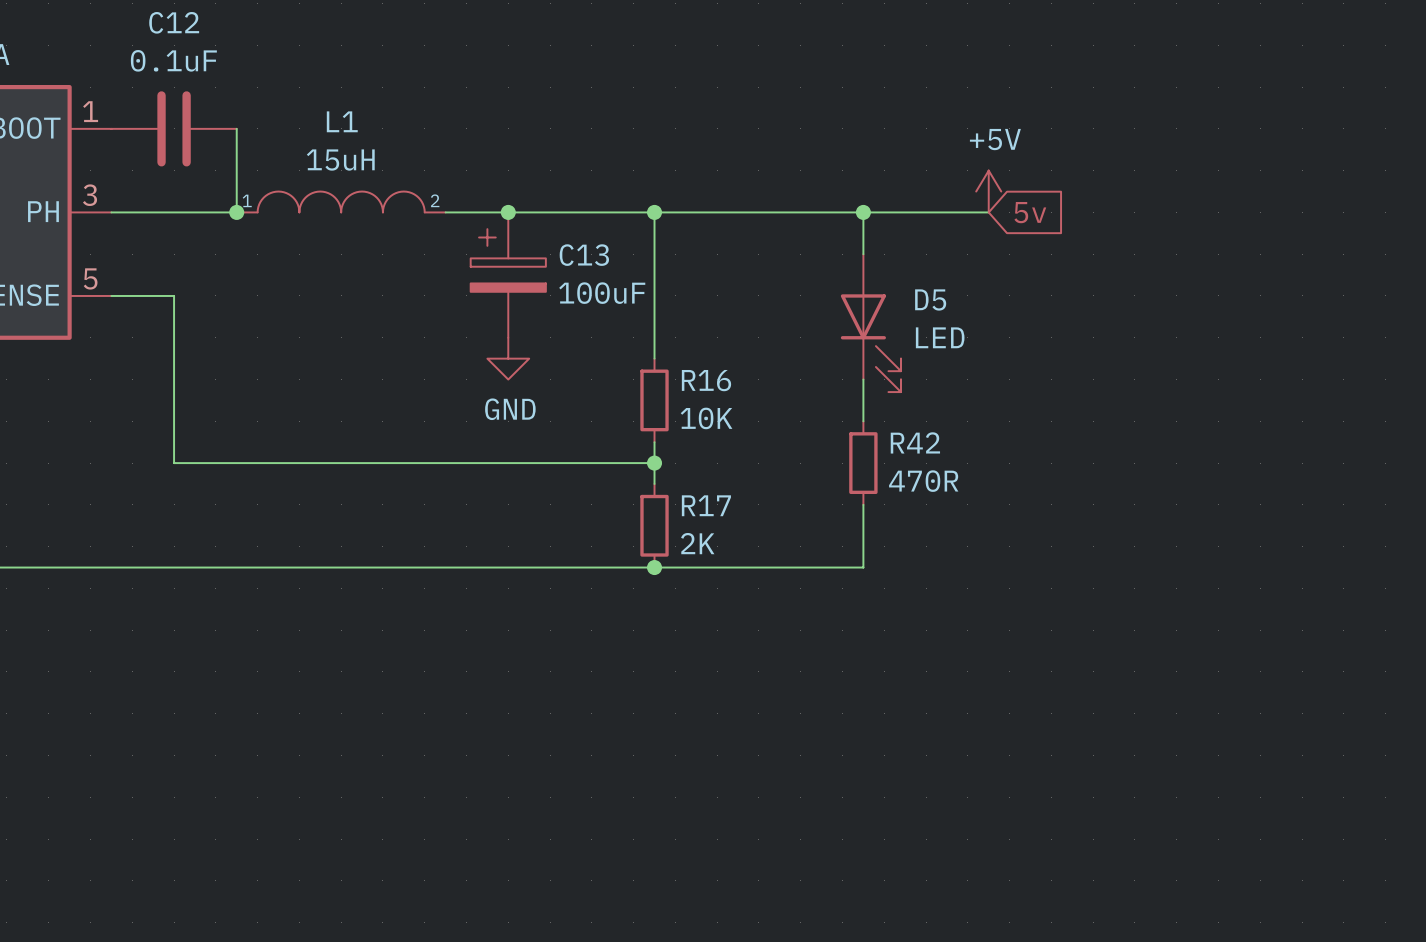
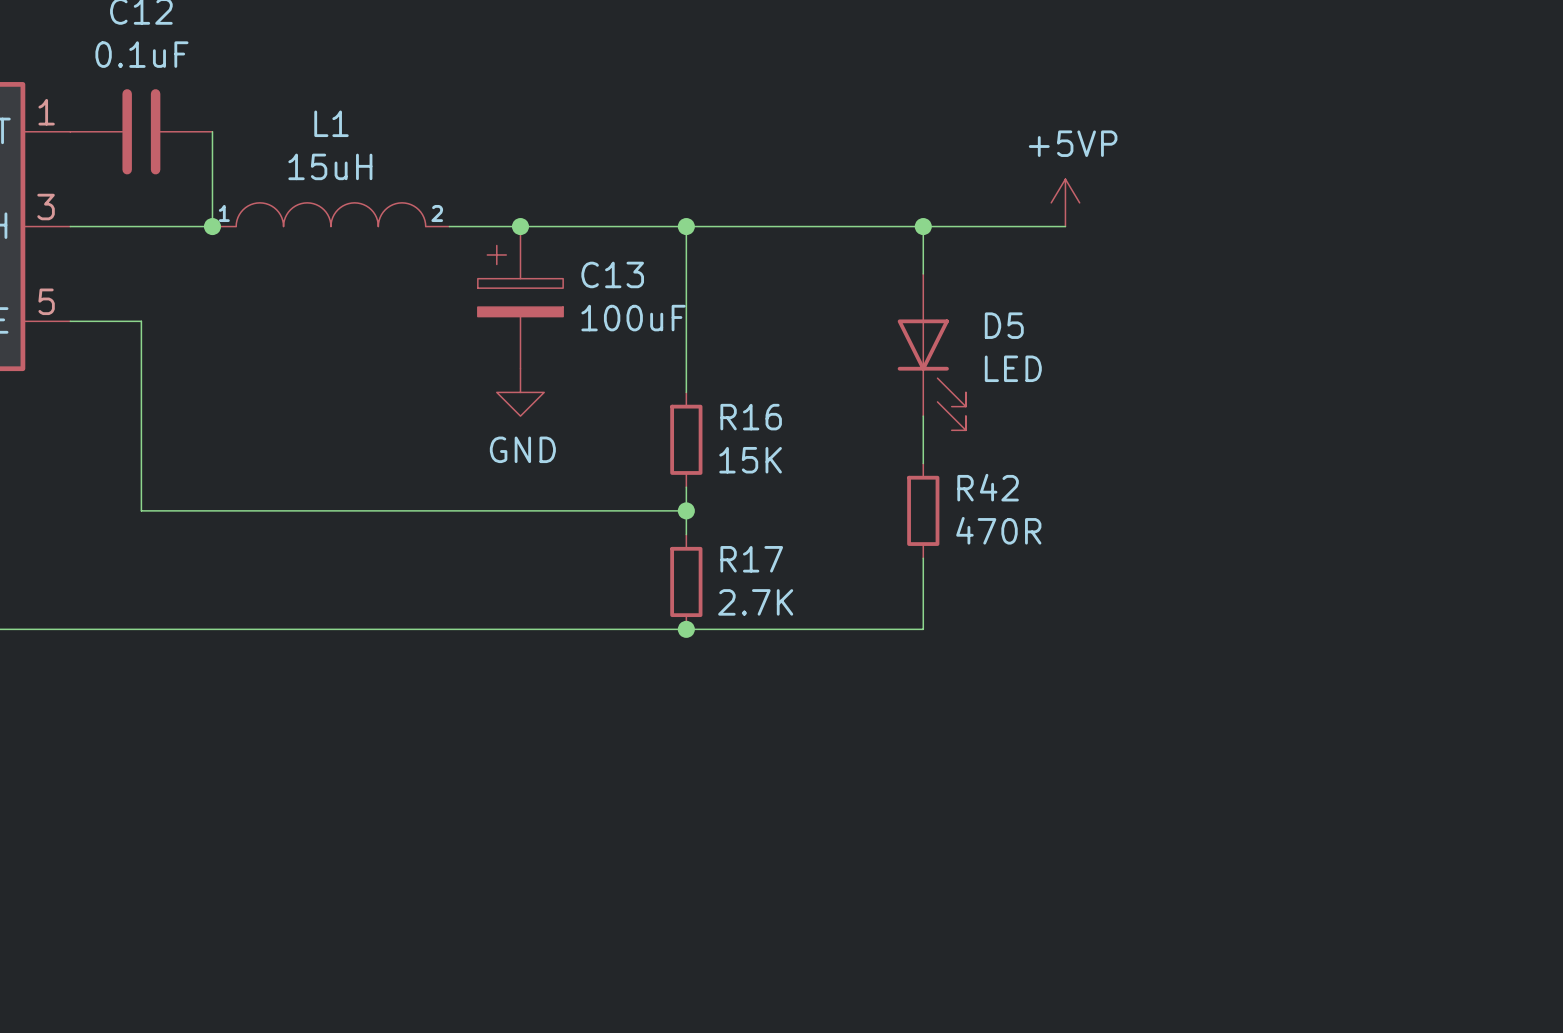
power symbol: +5V (988, 191) -> +5VP (1065, 202)
global label: 5v (1030, 212) -> none
R16 value: 10K (706, 418) -> 15K (750, 460)
R17 value: 2K (697, 543) -> 2.7K (755, 602)

